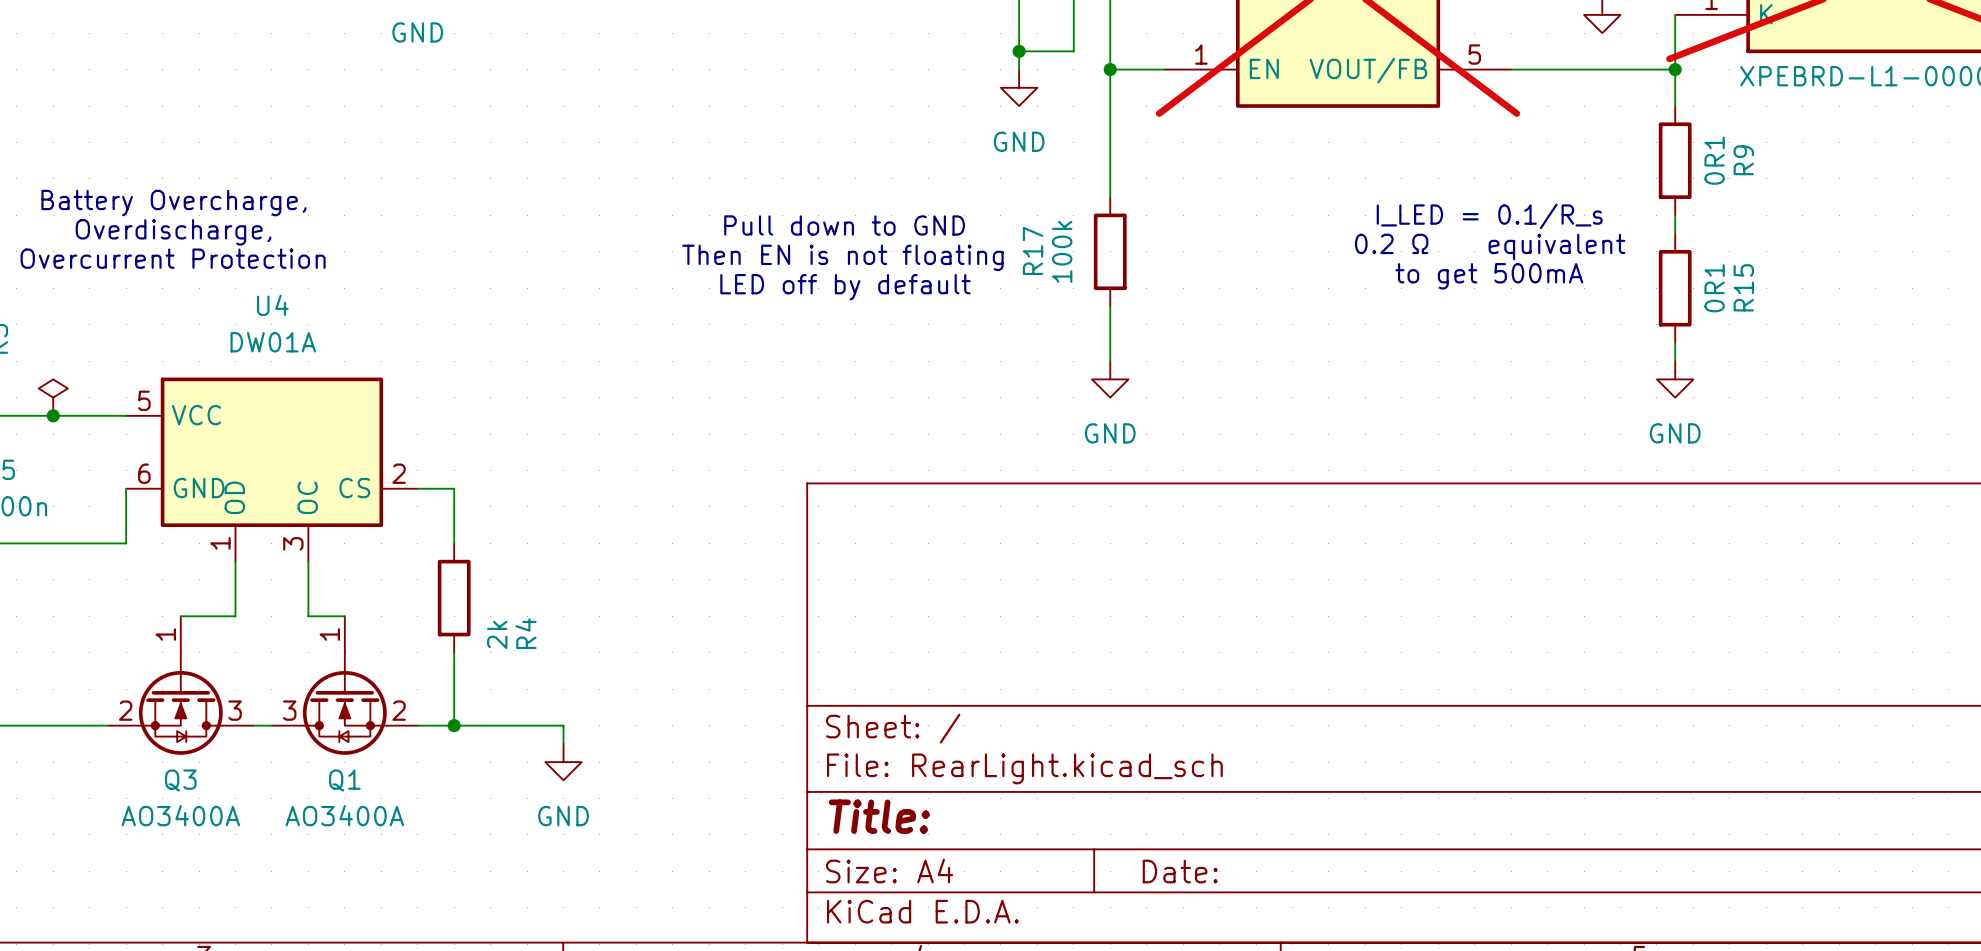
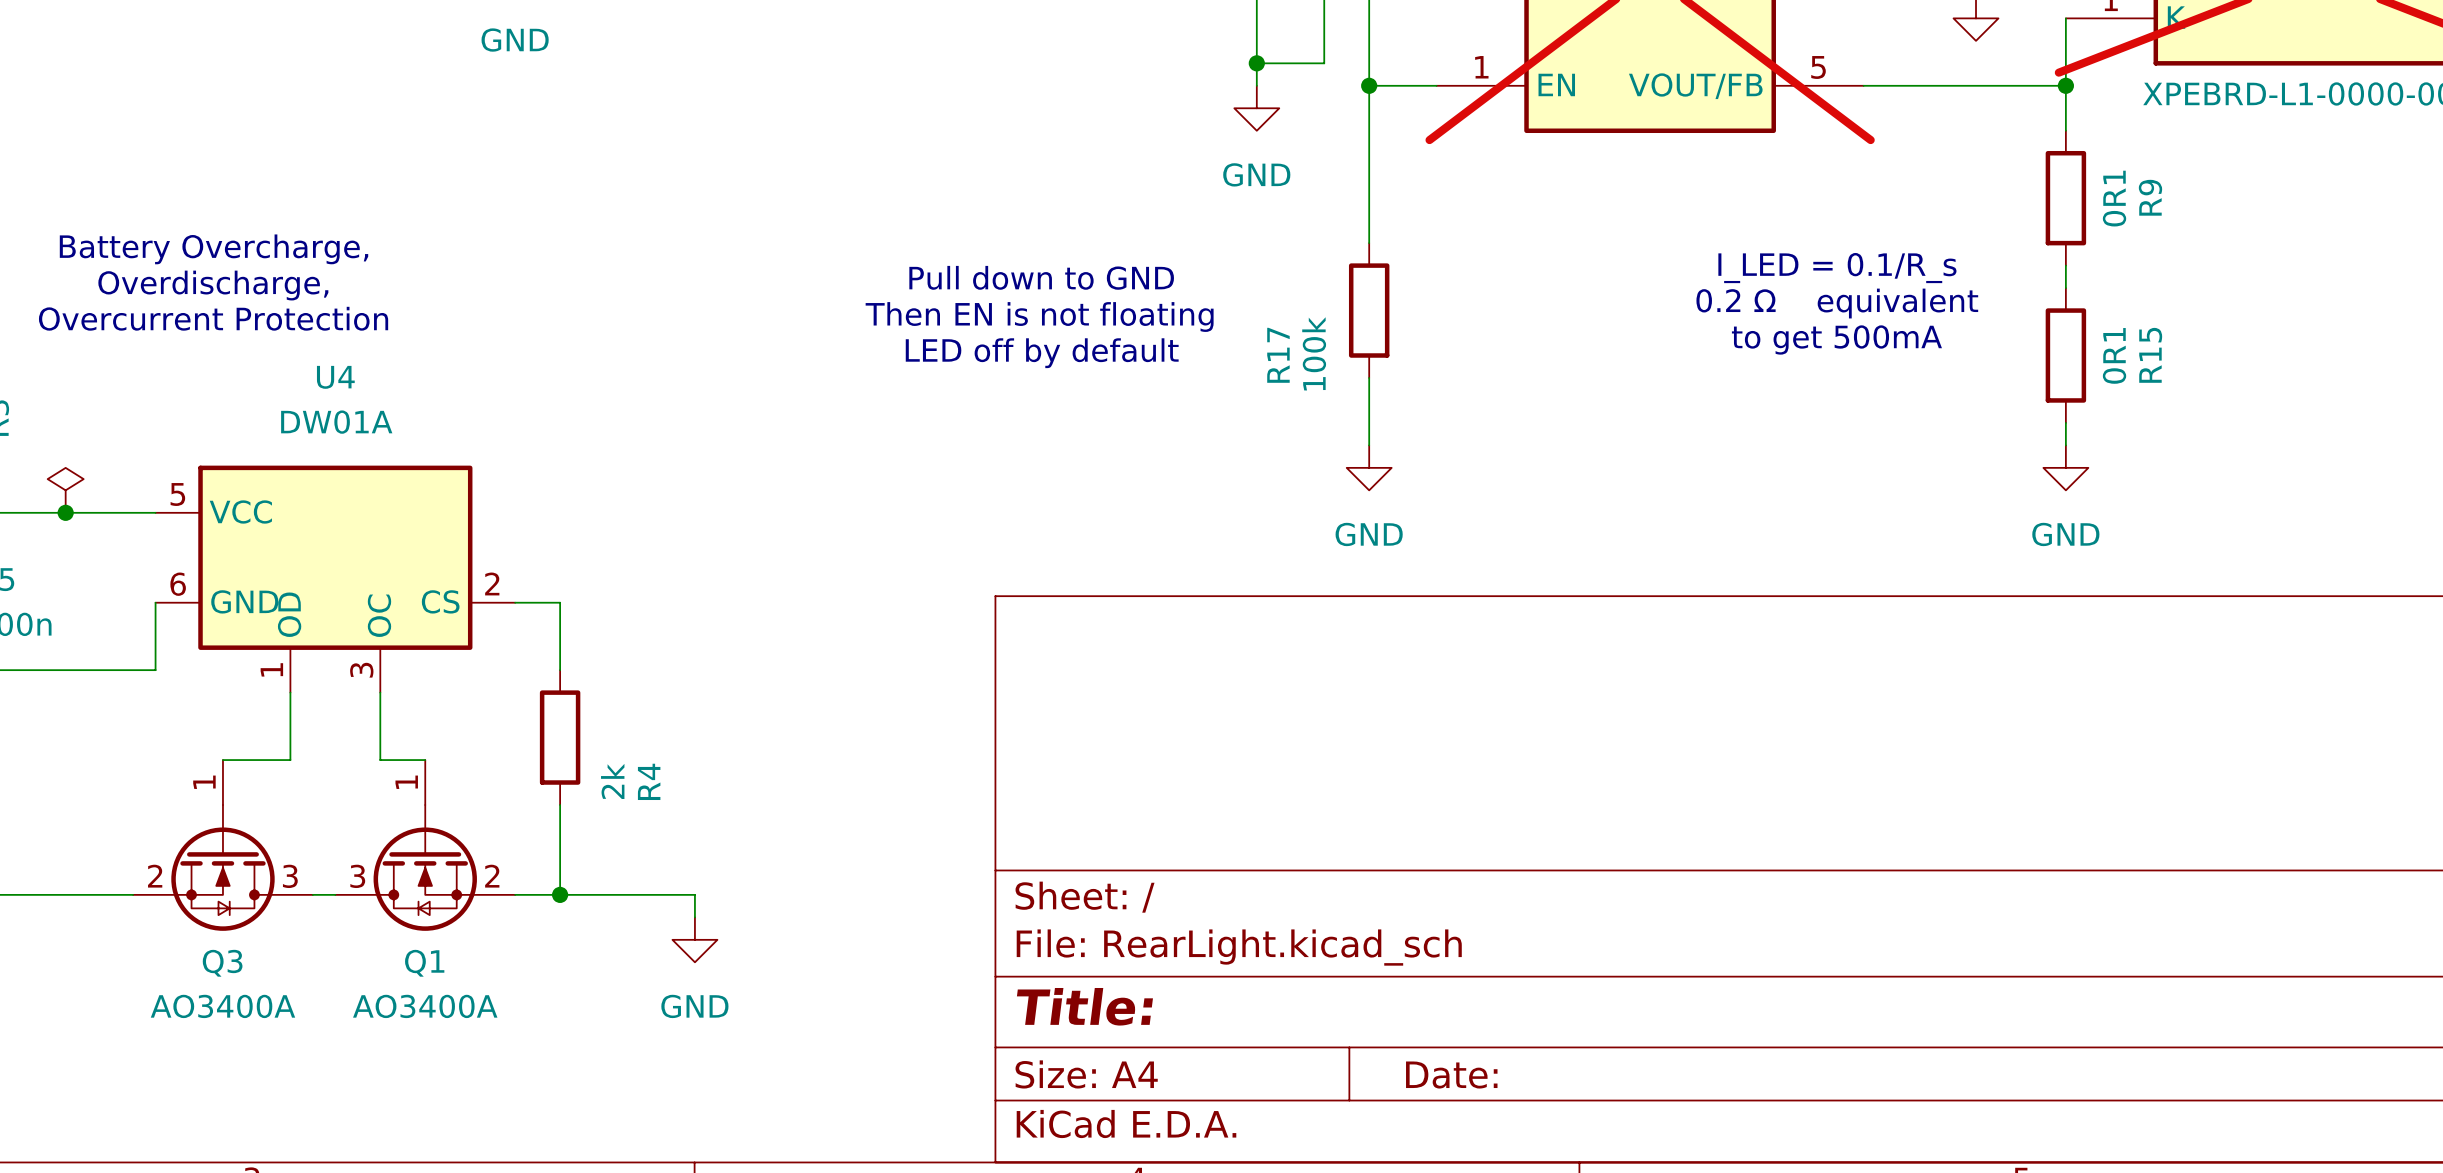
R17 name position: R17 (1033, 250) -> R17 (1278, 355)
R17 value position: 100k (1062, 251) -> 100k (1314, 353)

